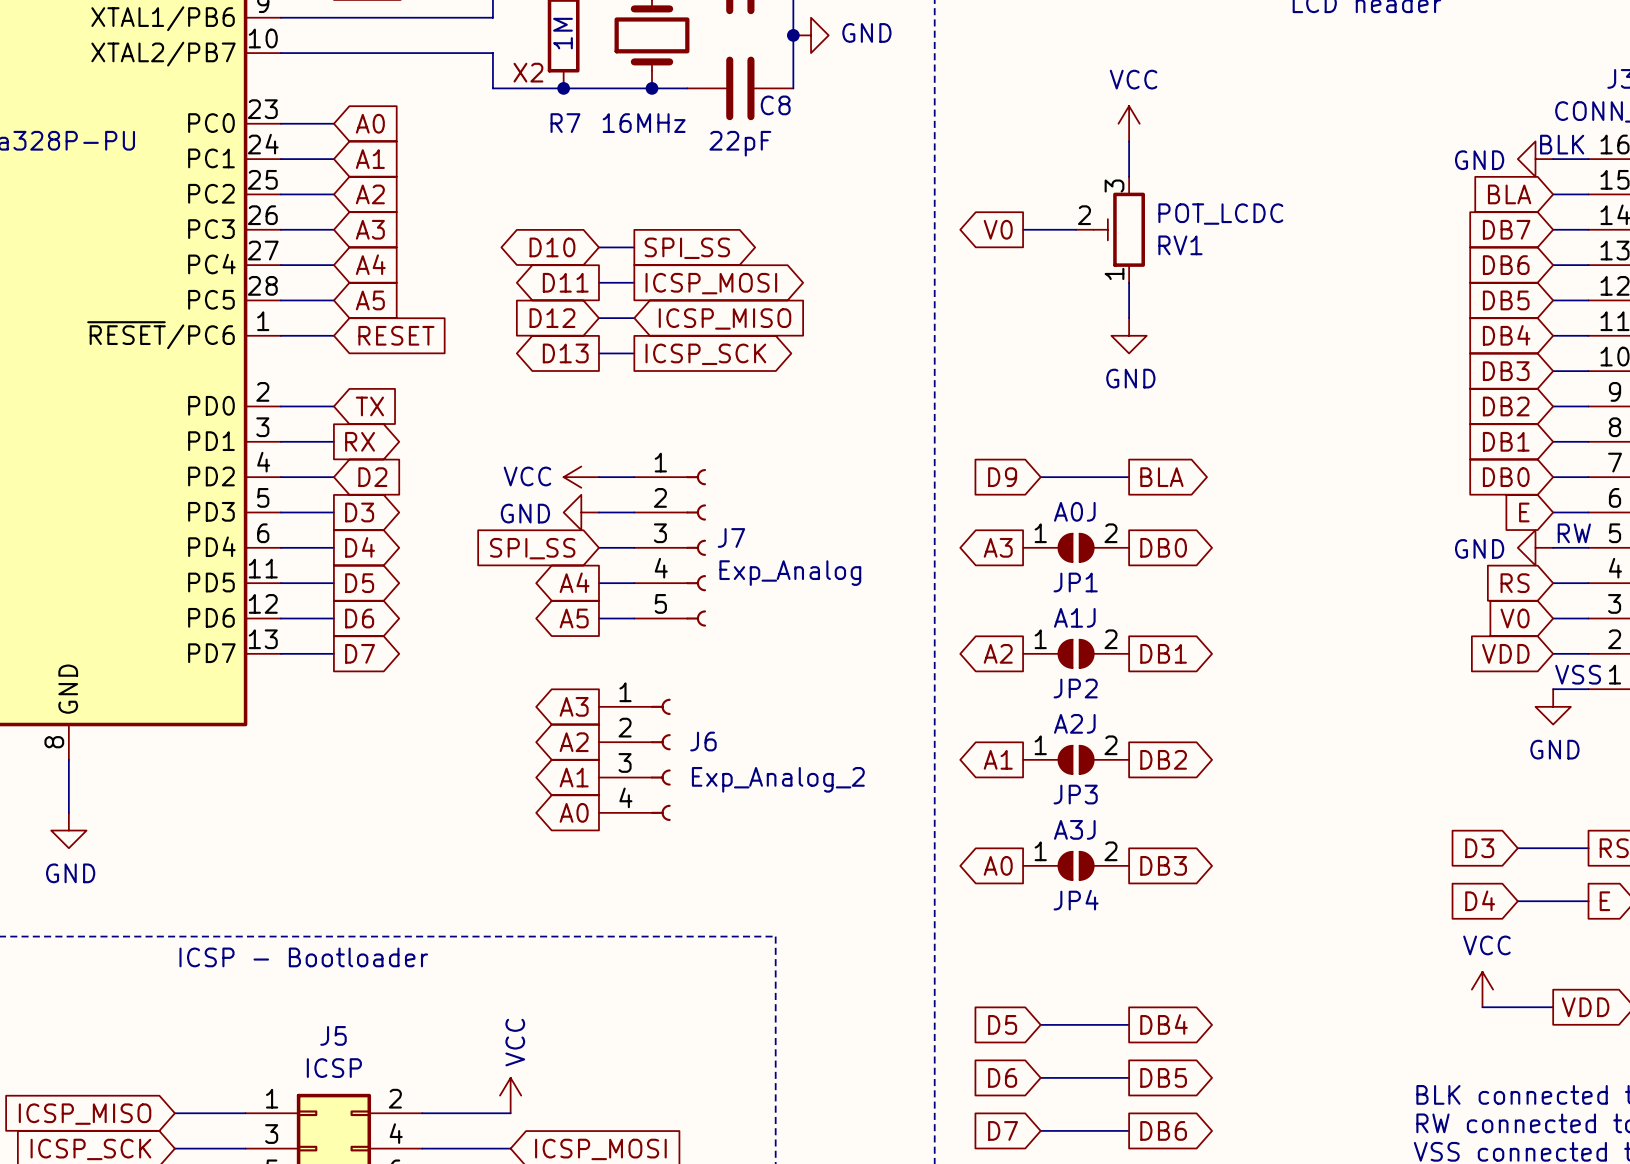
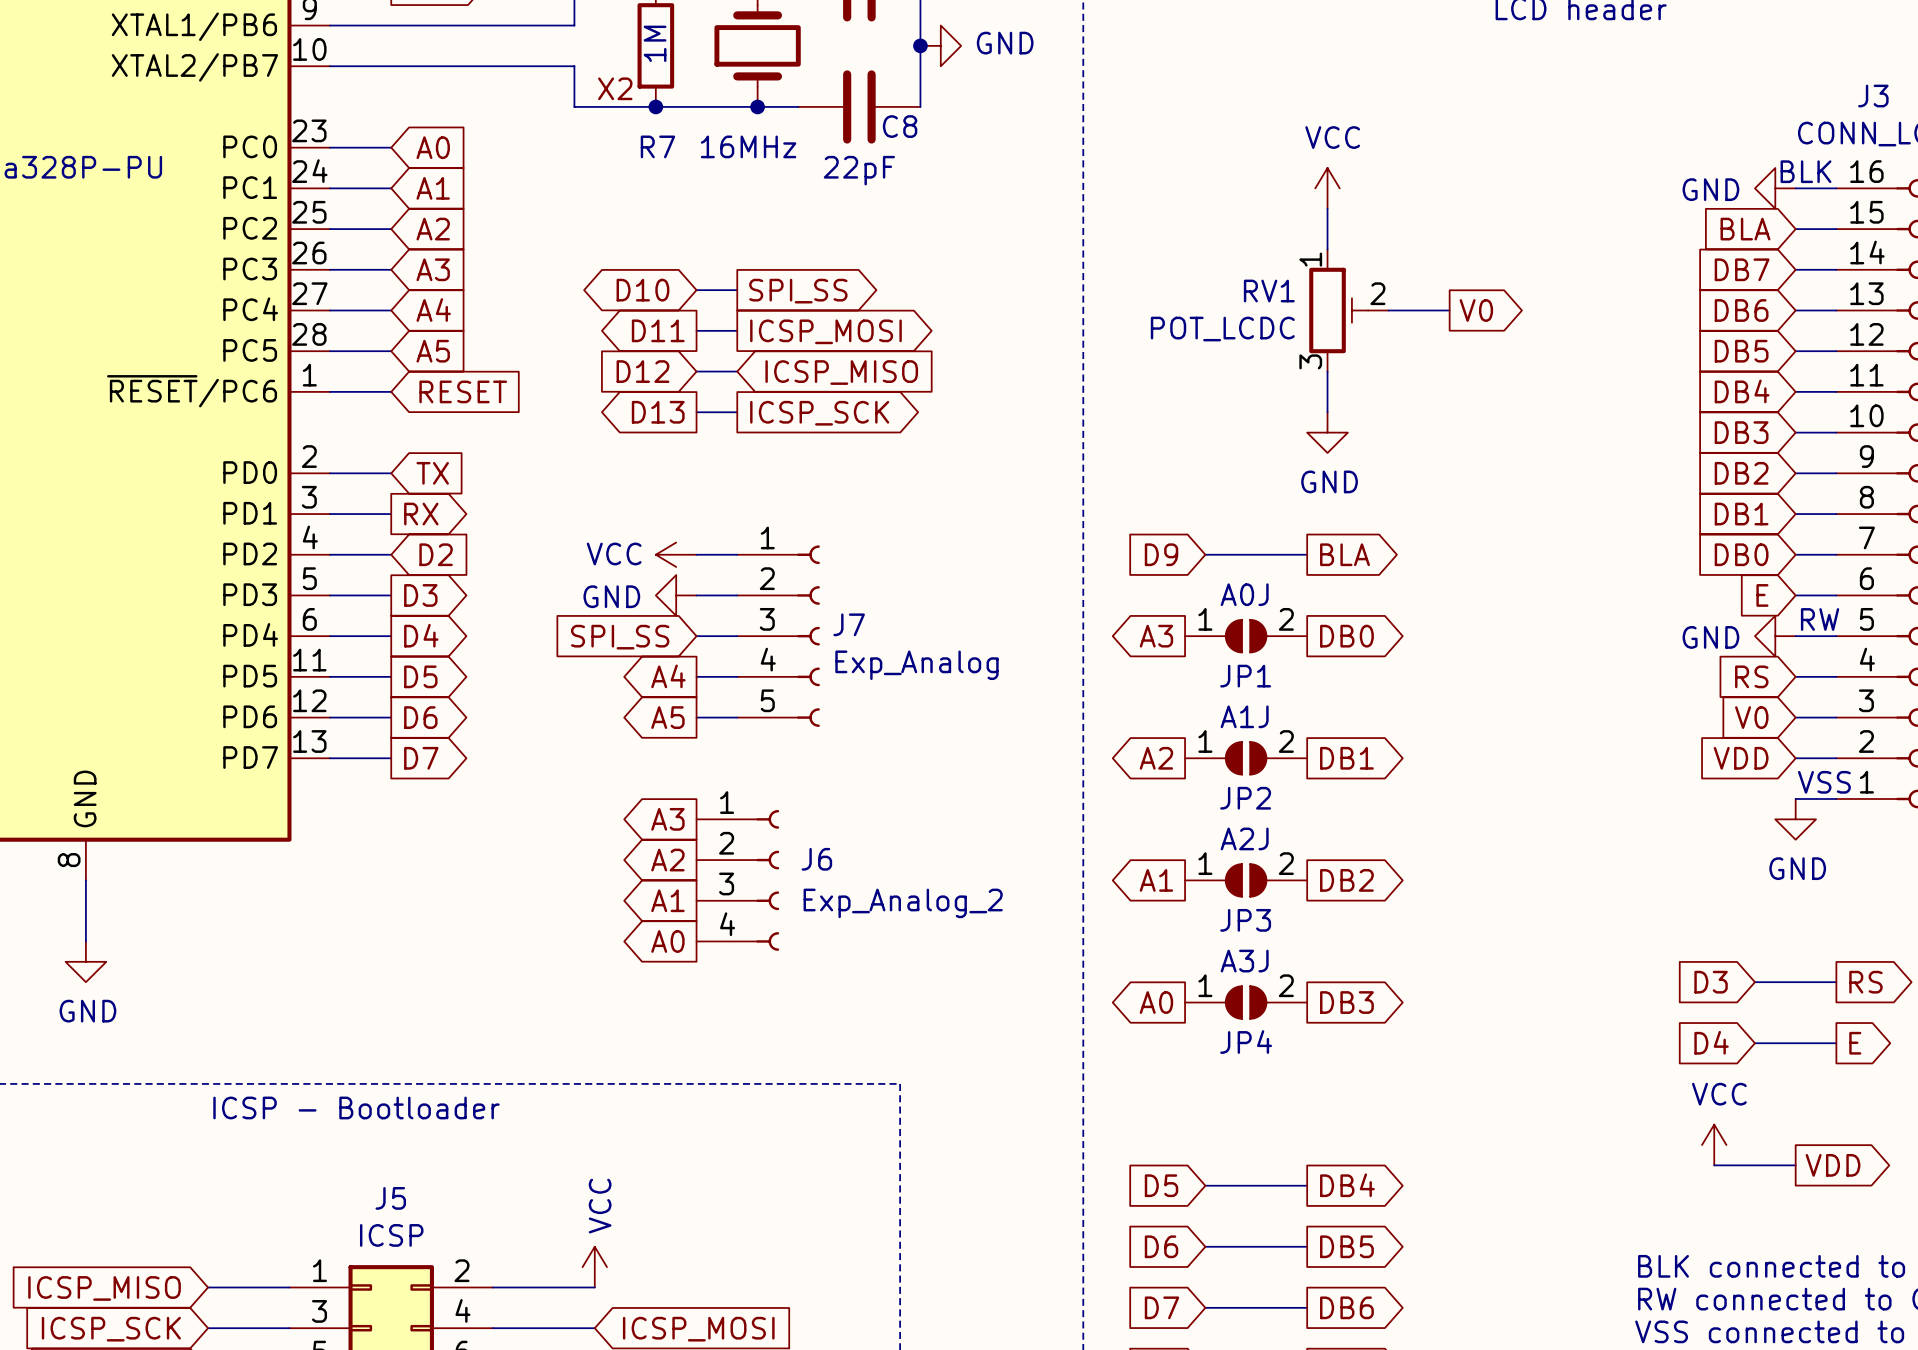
power symbol position: VCC (1129, 123) -> VCC (1327, 188)
wire: (1129, 141) (1129, 176) -> (1327, 208) (1327, 249)
global label rotation: 0° (998, 229) -> 180° (1476, 310)
global label position: V0 (998, 229) -> V0 (1476, 310)
wire: (1023, 229) (1076, 229) -> (1388, 310) (1449, 310)
RV1 position: (1110, 229) -> (1348, 310)
RV1 rotation: 0° (1119, 229) -> 180° (1338, 310)
wire: (1129, 282) (1129, 318) -> (1327, 371) (1327, 412)
power symbol position: GND (1129, 335) -> GND (1327, 432)

